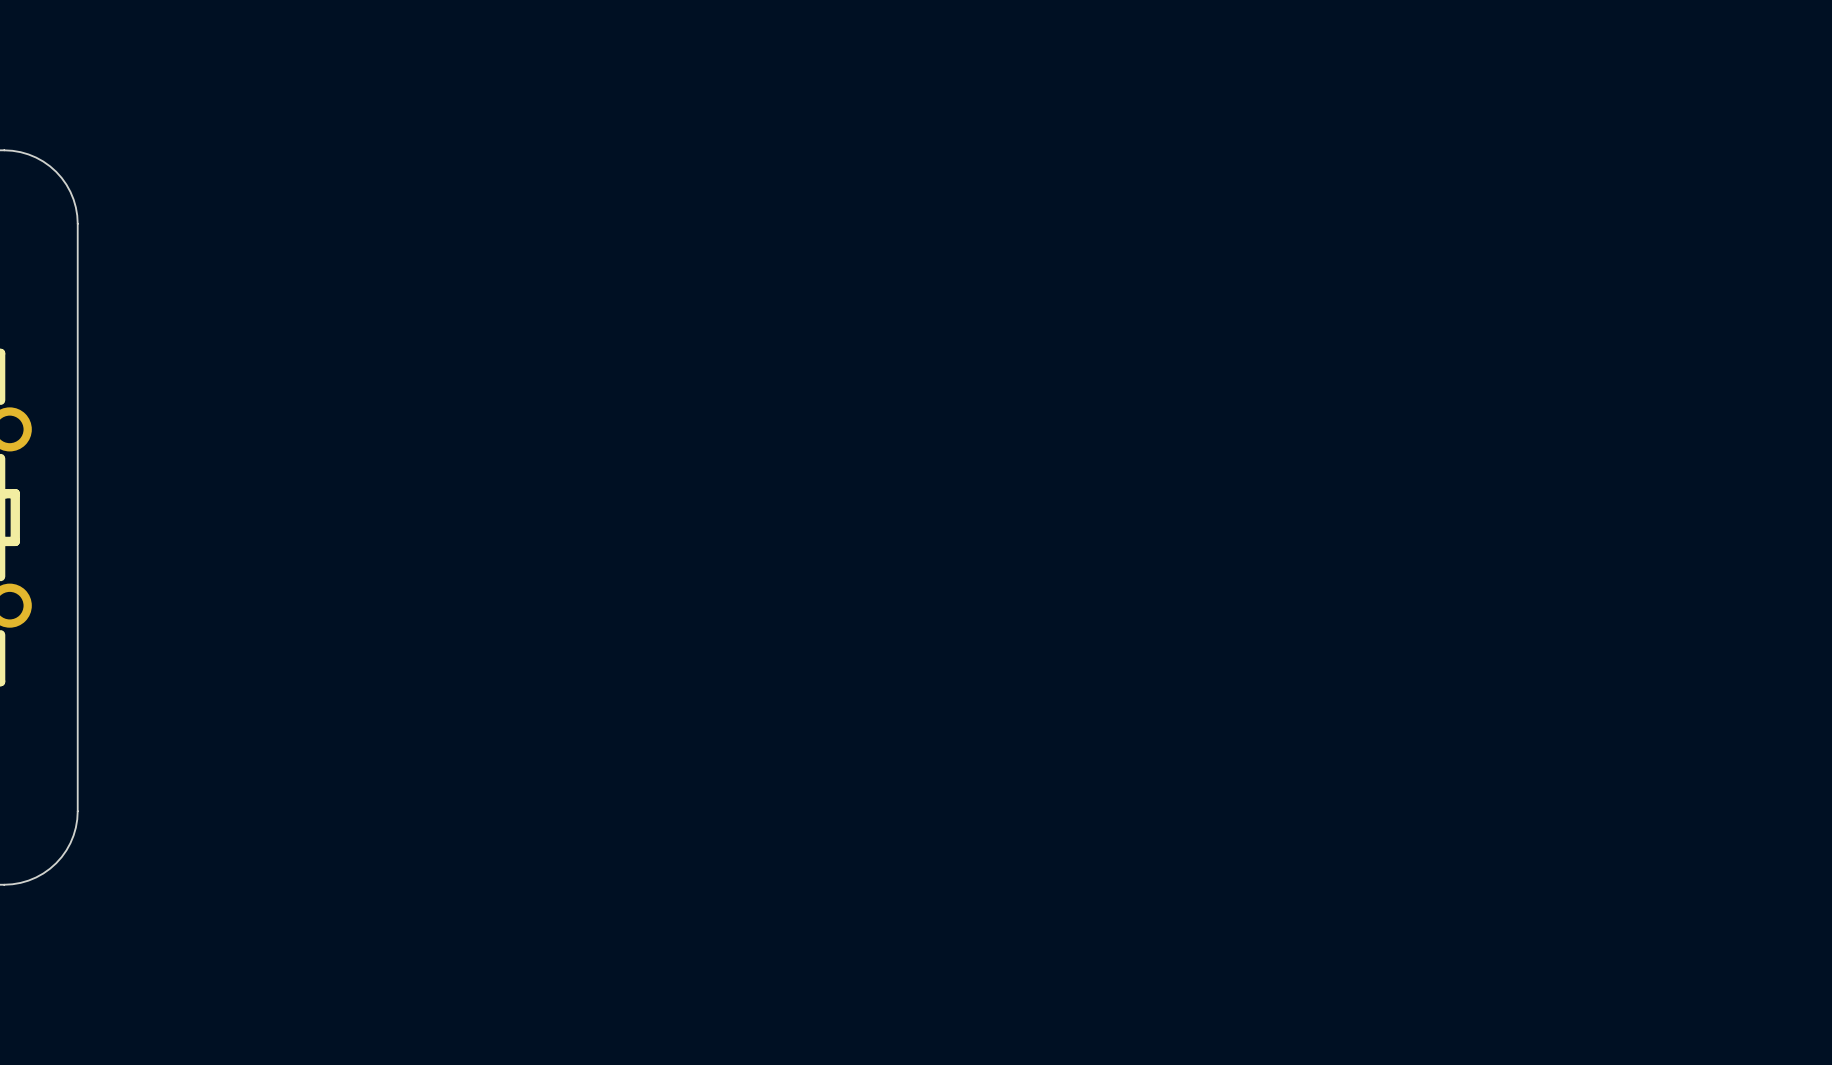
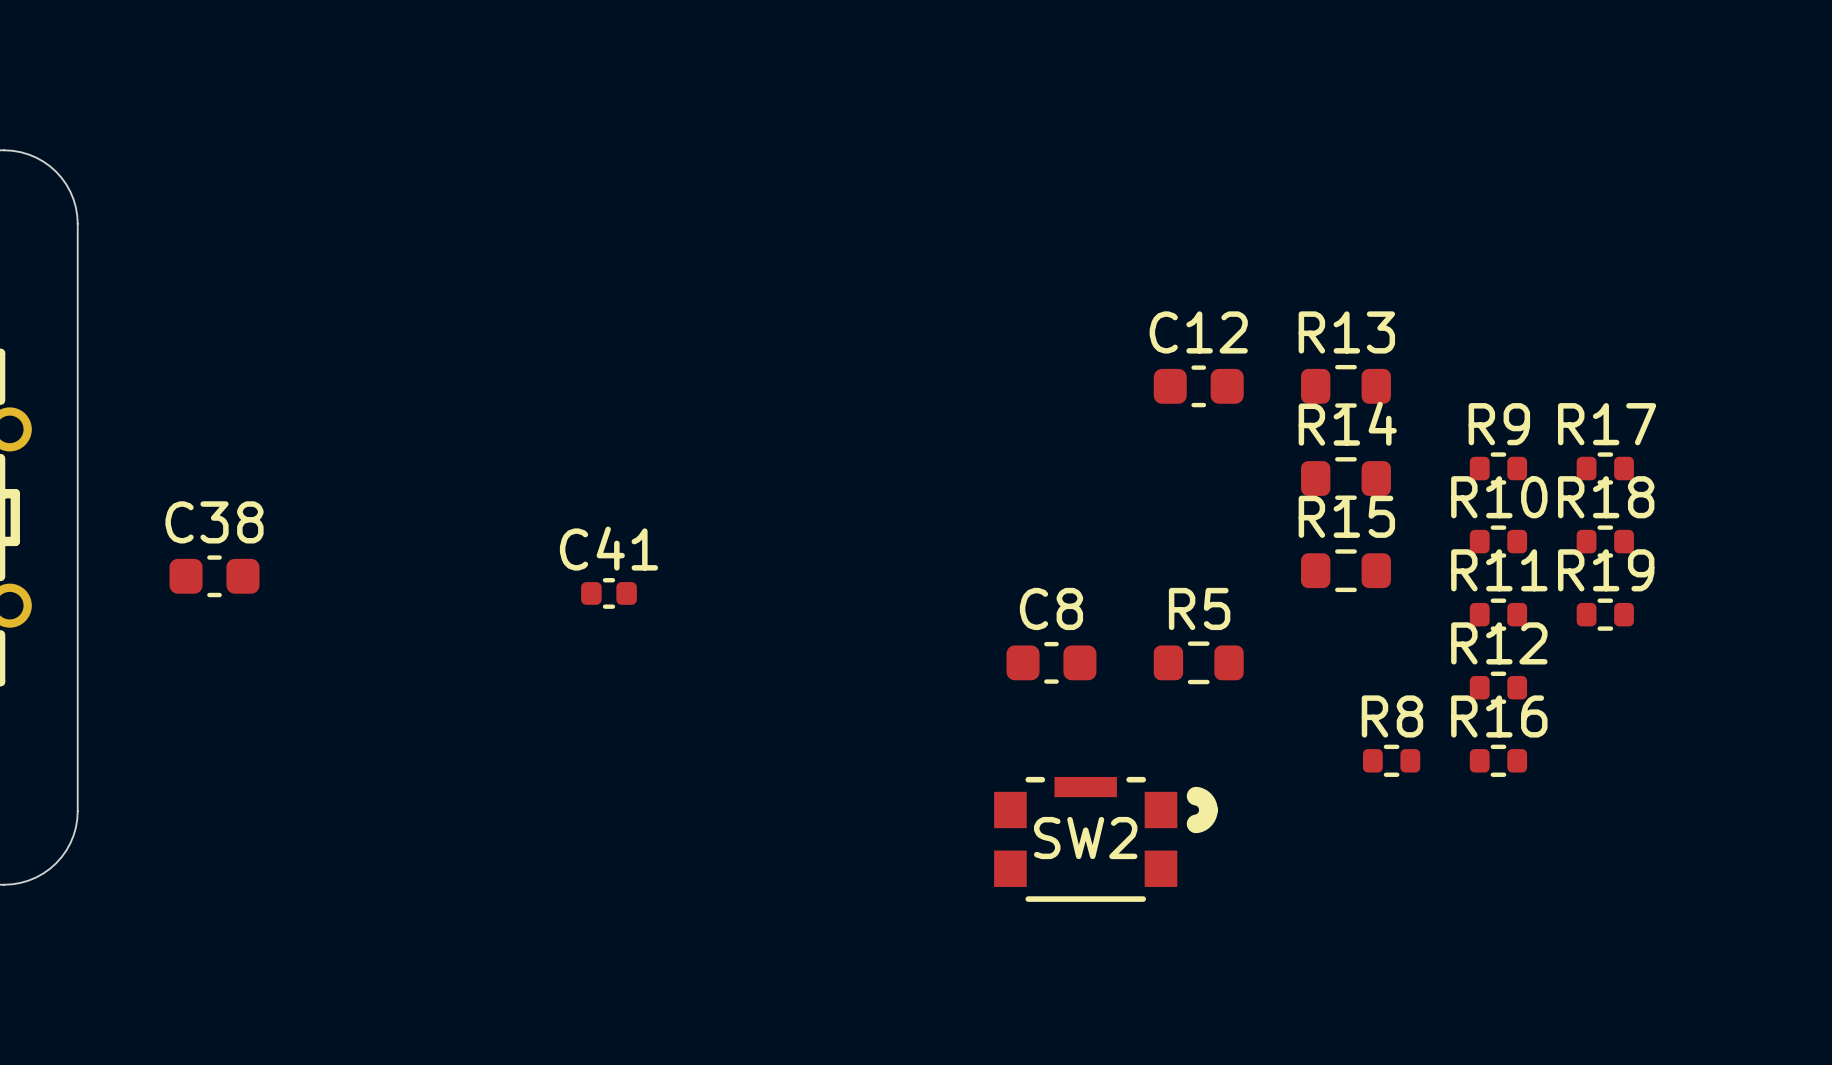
C12: none -> (1198, 386)
R13: none -> (1345, 386)
R9: none -> (1498, 468)
R17: none -> (1605, 468)
R14: none -> (1345, 478)
R10: none -> (1498, 541)
R18: none -> (1605, 541)
R15: none -> (1345, 570)
C38: none -> (214, 576)
C41: none -> (608, 593)
R11: none -> (1498, 614)
R19: none -> (1605, 614)
C8: none -> (1051, 662)
R5: none -> (1198, 662)
R12: none -> (1498, 687)
R8: none -> (1391, 760)
R16: none -> (1498, 760)
SW2: none -> (1105, 839)

